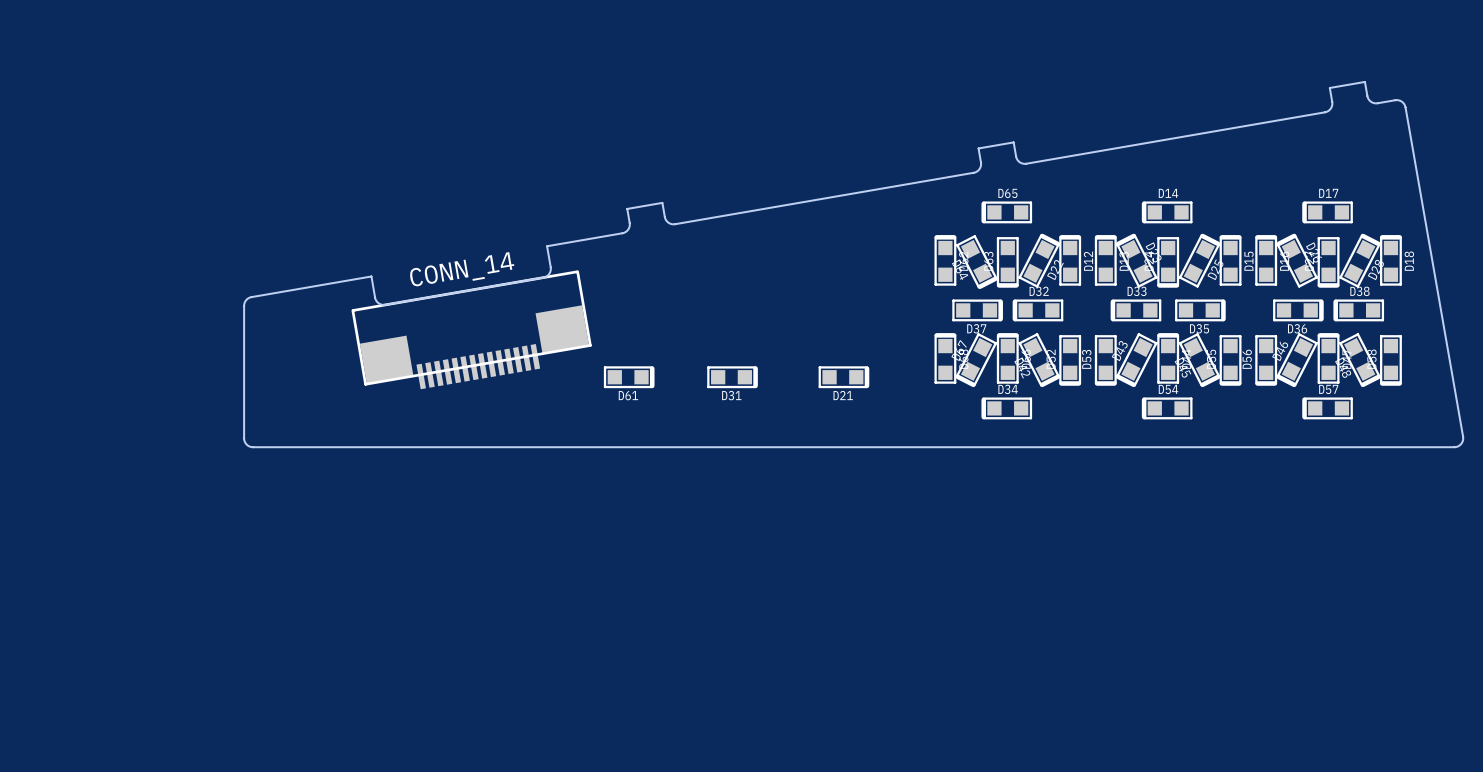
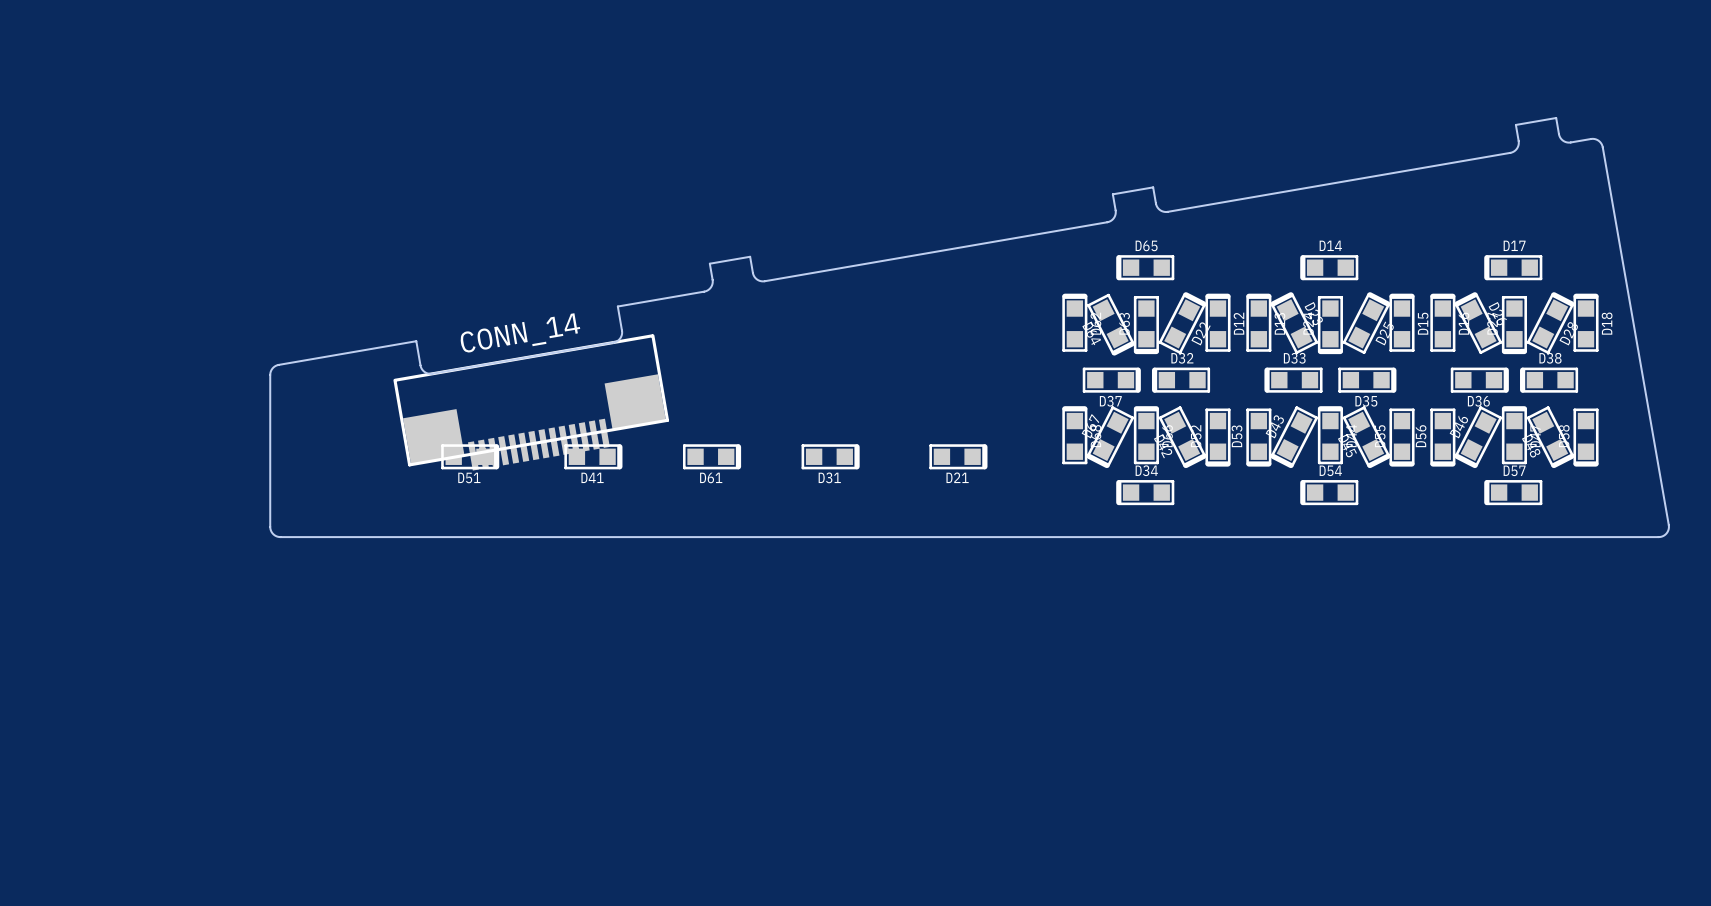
D51: none -> (470, 456)
D41: none -> (593, 456)

